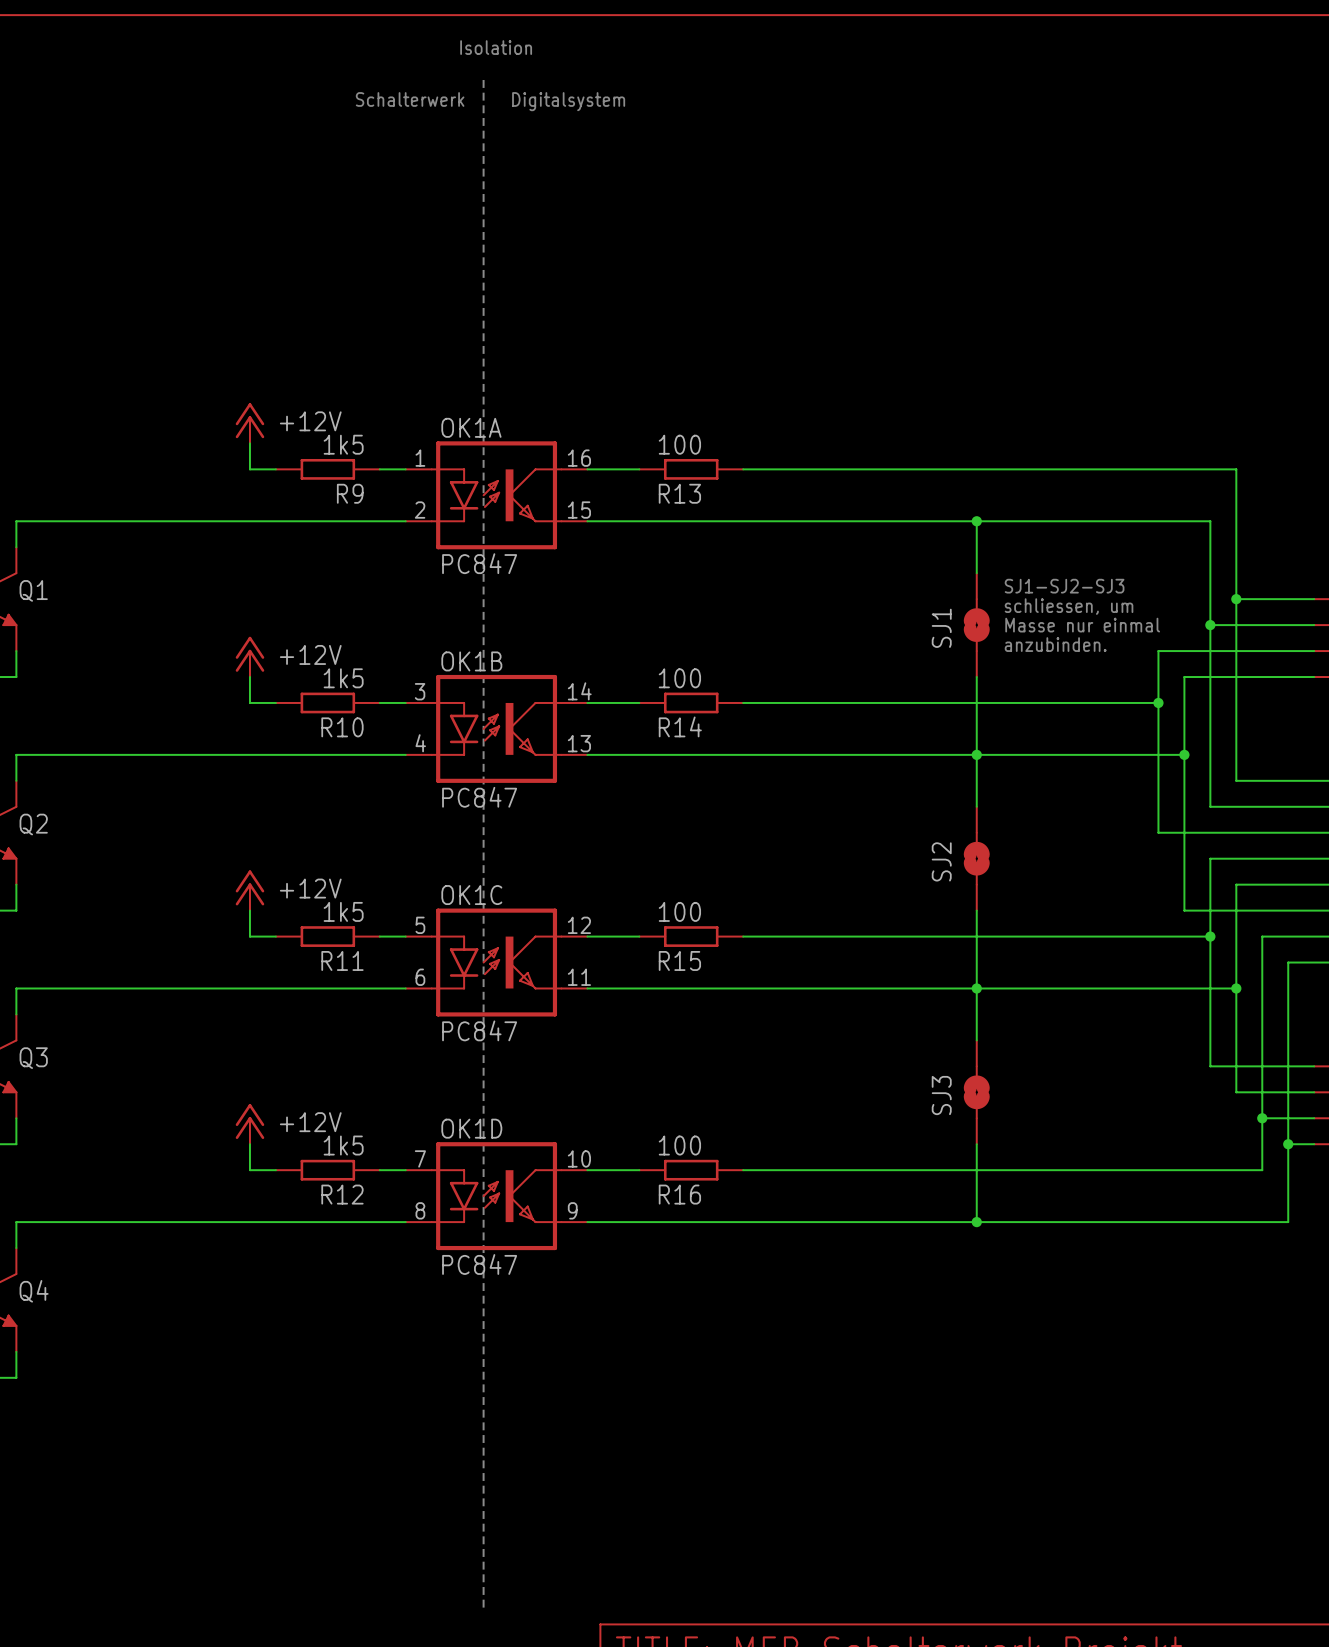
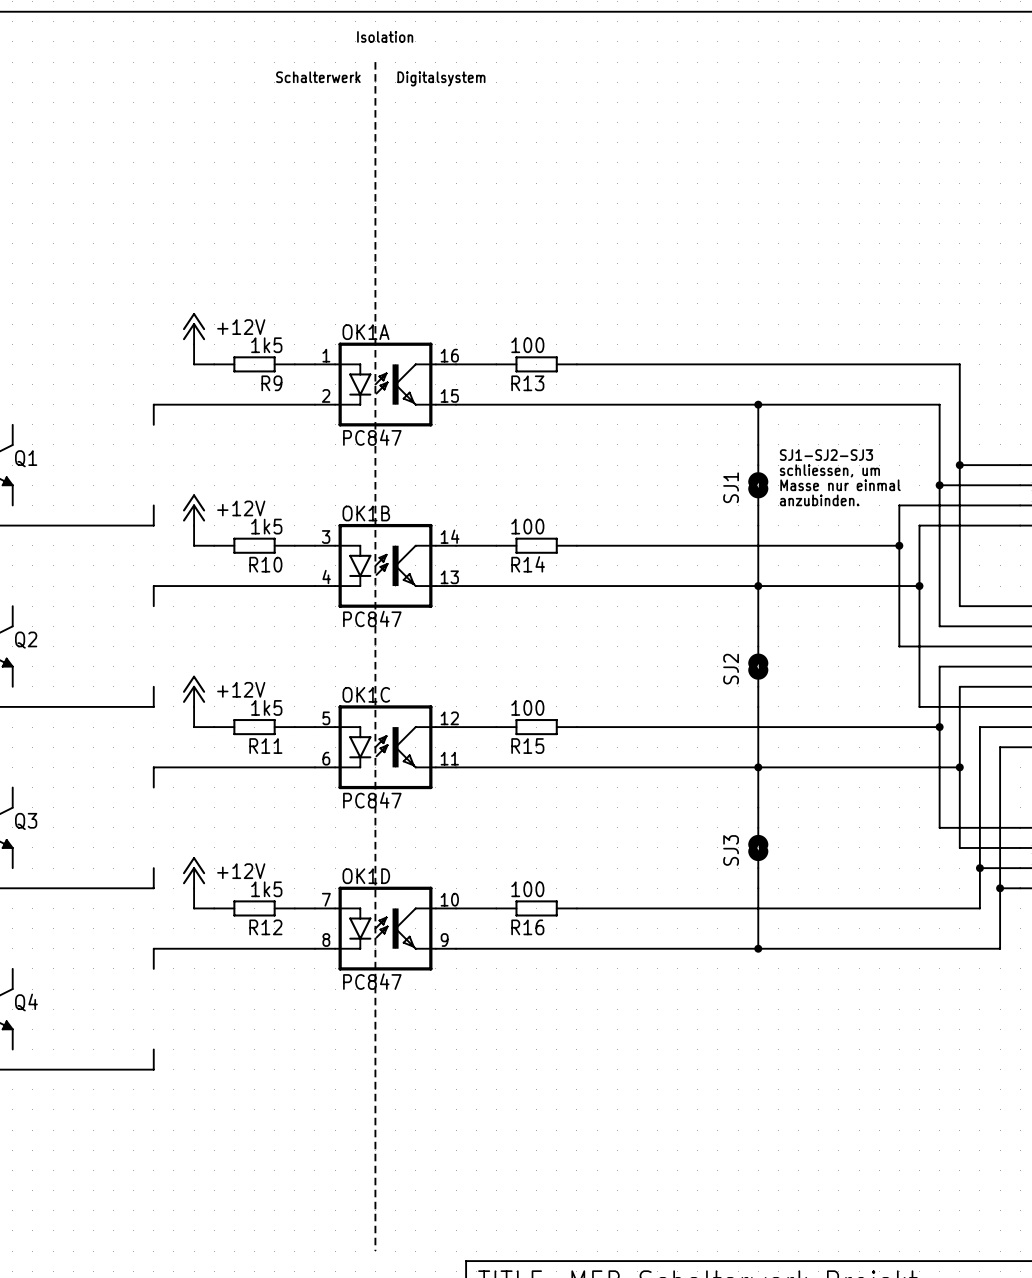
wire: (198, 521) (16, 521) (16, 547) -> (153, 404) (153, 424)
wire: (16, 651) (16, 677) -> (153, 505) (153, 525) (12, 525)
wire: (198, 754) (16, 754) (16, 780) -> (153, 586) (153, 606)
wire: (16, 884) (16, 910) -> (153, 686) (153, 706) (12, 706)
wire: (198, 988) (16, 988) (16, 1014) -> (153, 767) (153, 787)
wire: (16, 1118) (16, 1144) -> (153, 868) (153, 888) (12, 888)
wire: (198, 1222) (16, 1222) (16, 1248) -> (153, 948) (153, 968)
wire: (16, 1351) (16, 1377) -> (153, 1049) (153, 1069) (12, 1069)

